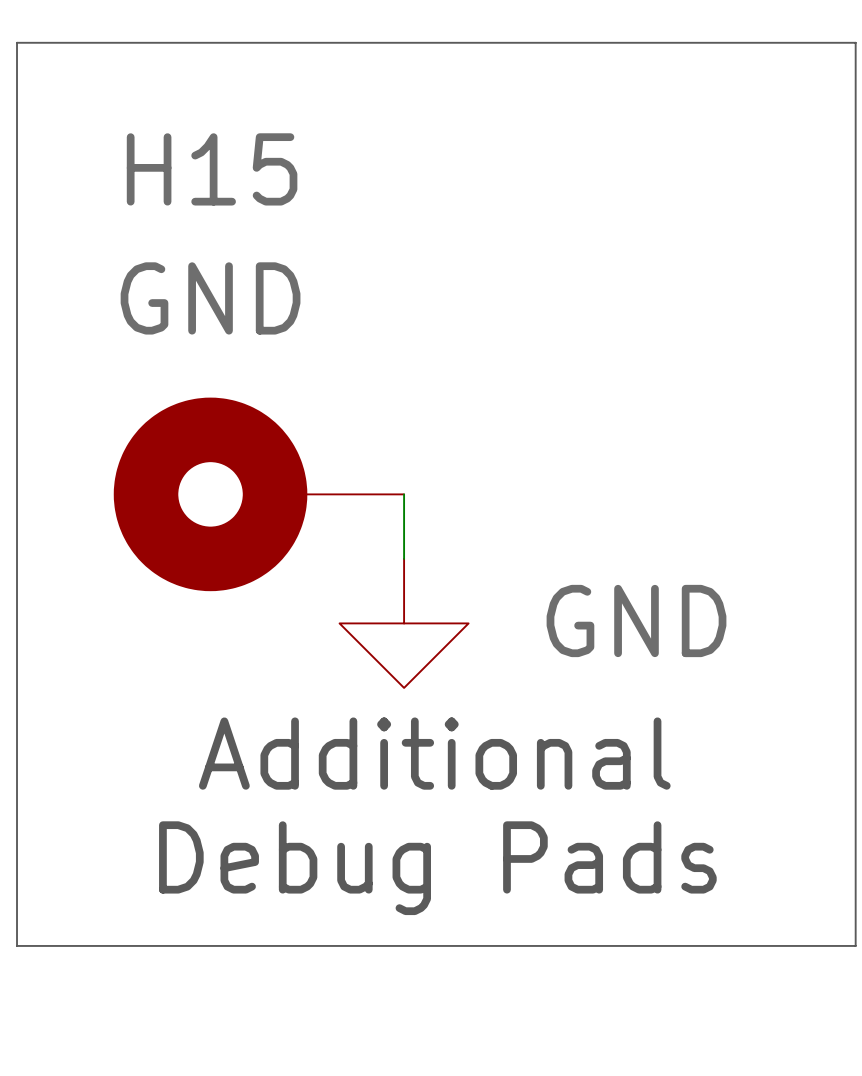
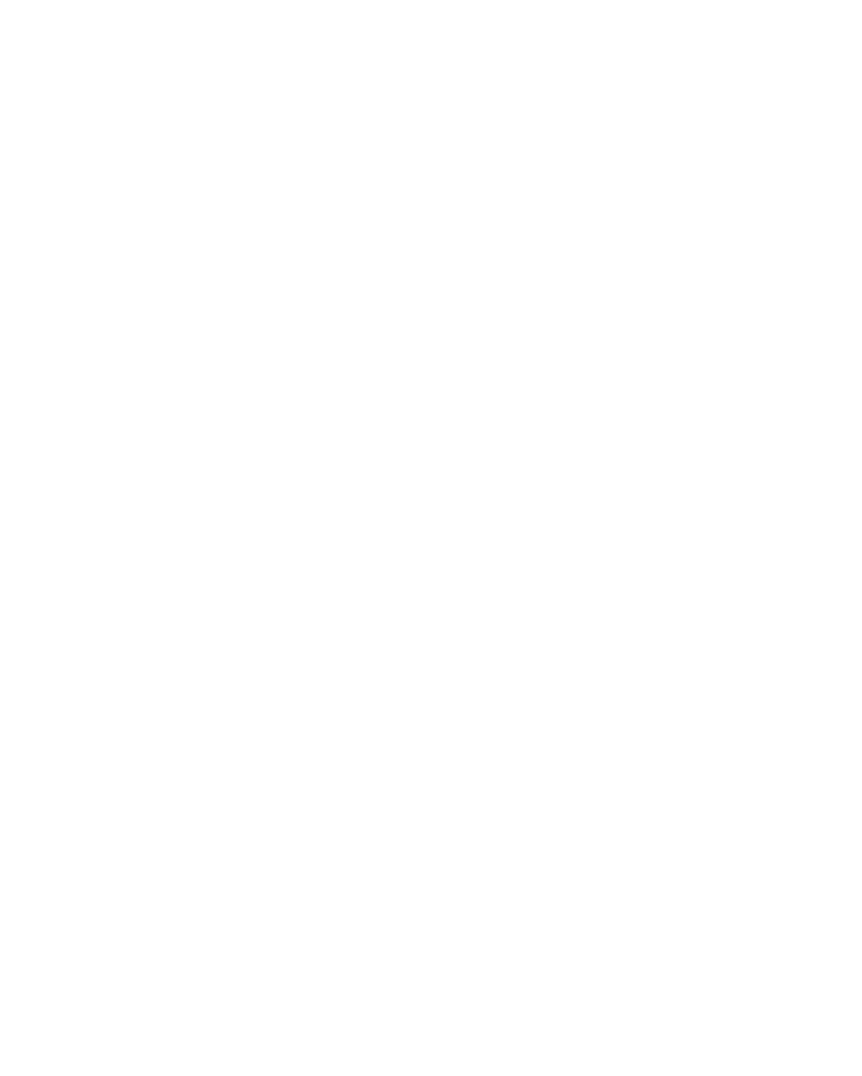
line: (17, 42) (855, 42) (855, 945) (17, 945) (17, 42) -> none
H15: GND (258, 494) -> none
wire: (404, 494) (404, 558) -> none
power symbol: GND (404, 623) -> none
text: Additional (434, 753) -> none
text: Debug Pads (437, 868) -> none

